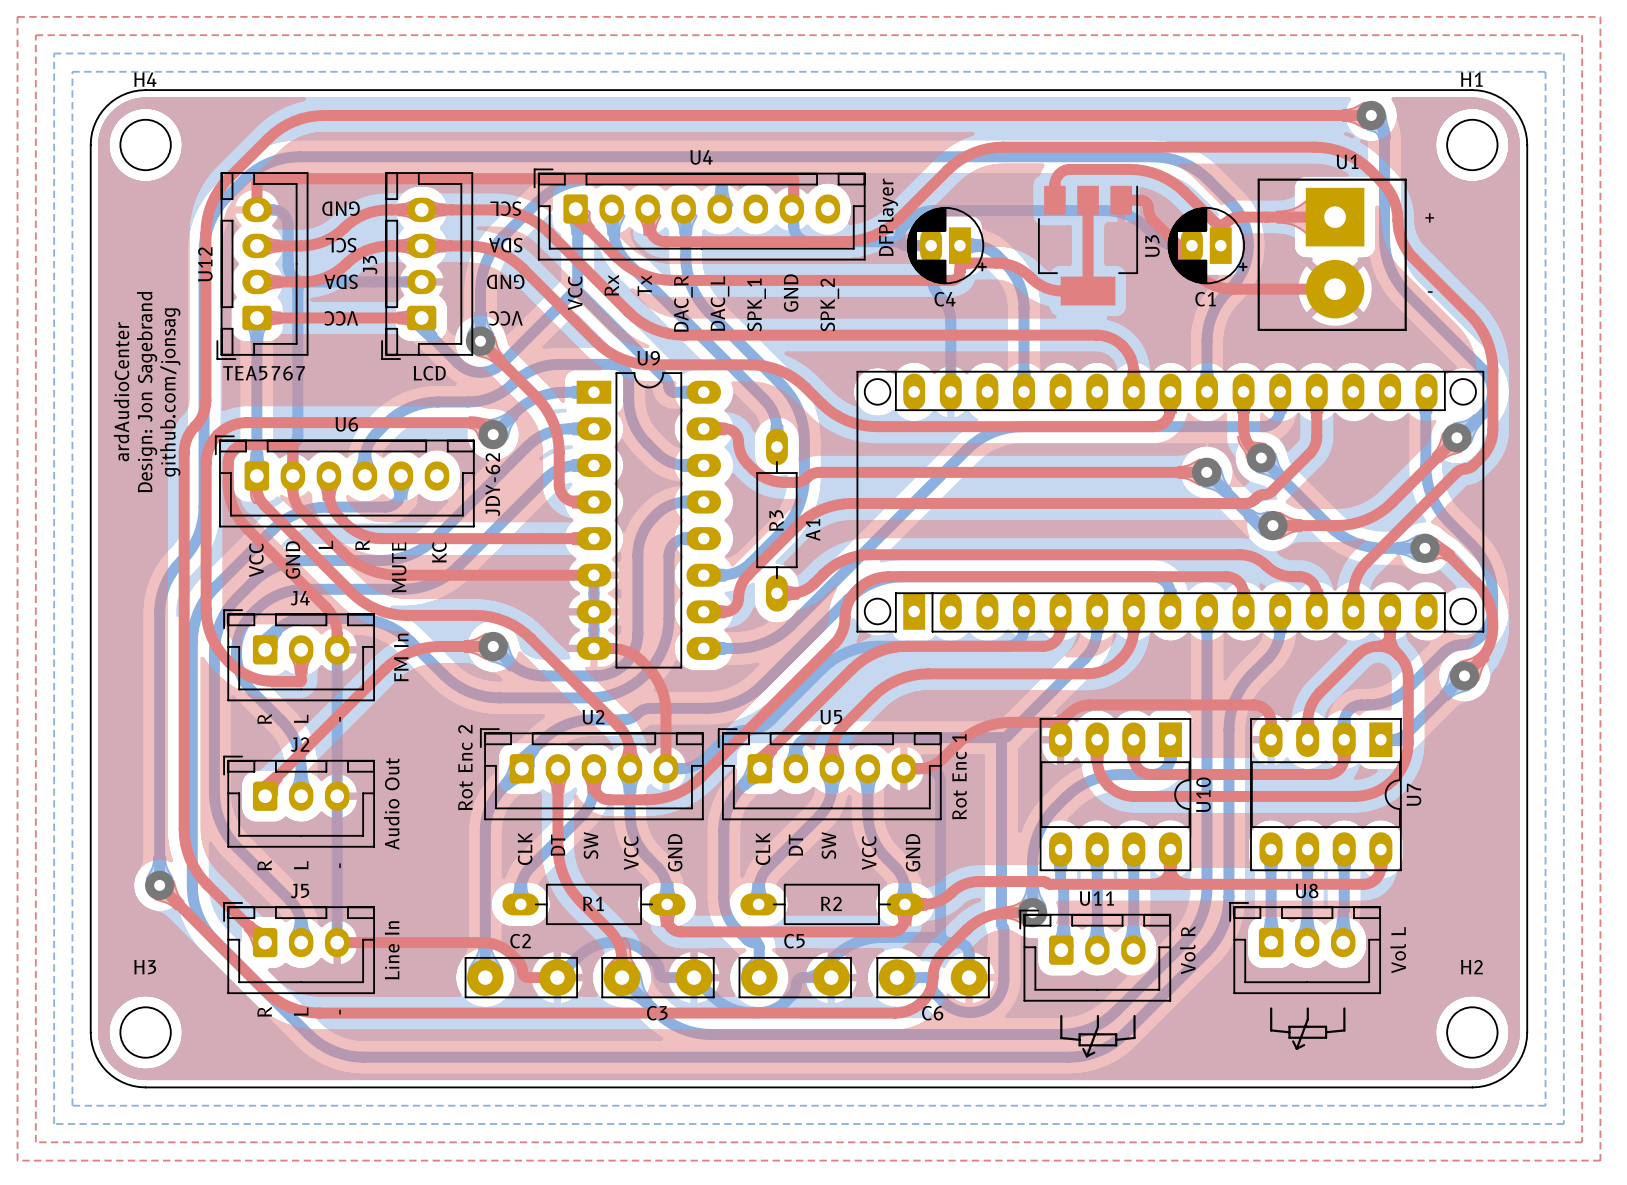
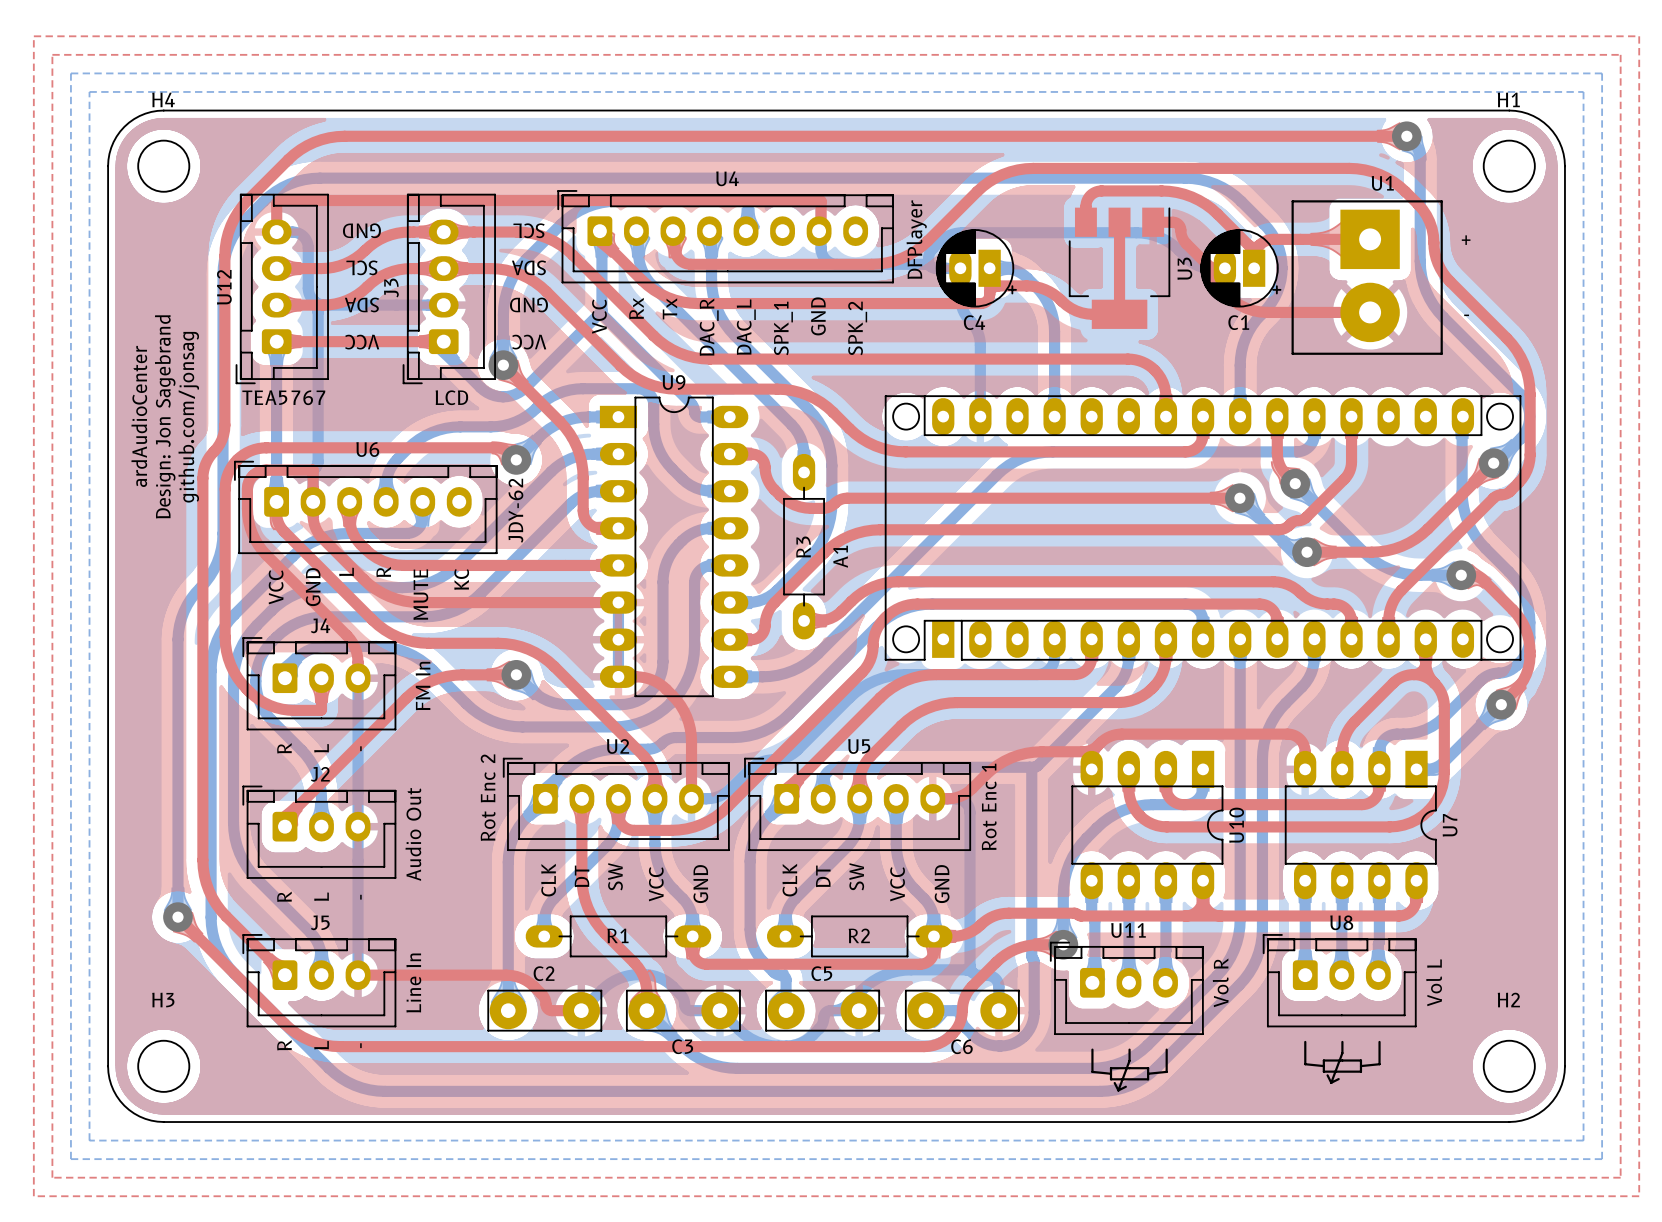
U9 footprint: [576, 372, 722, 669] -> [599, 396, 749, 698]
U10 footprint: [1039, 718, 1192, 872] -> [1071, 750, 1224, 900]
U7 footprint: [1250, 718, 1402, 872] -> [1284, 750, 1437, 900]

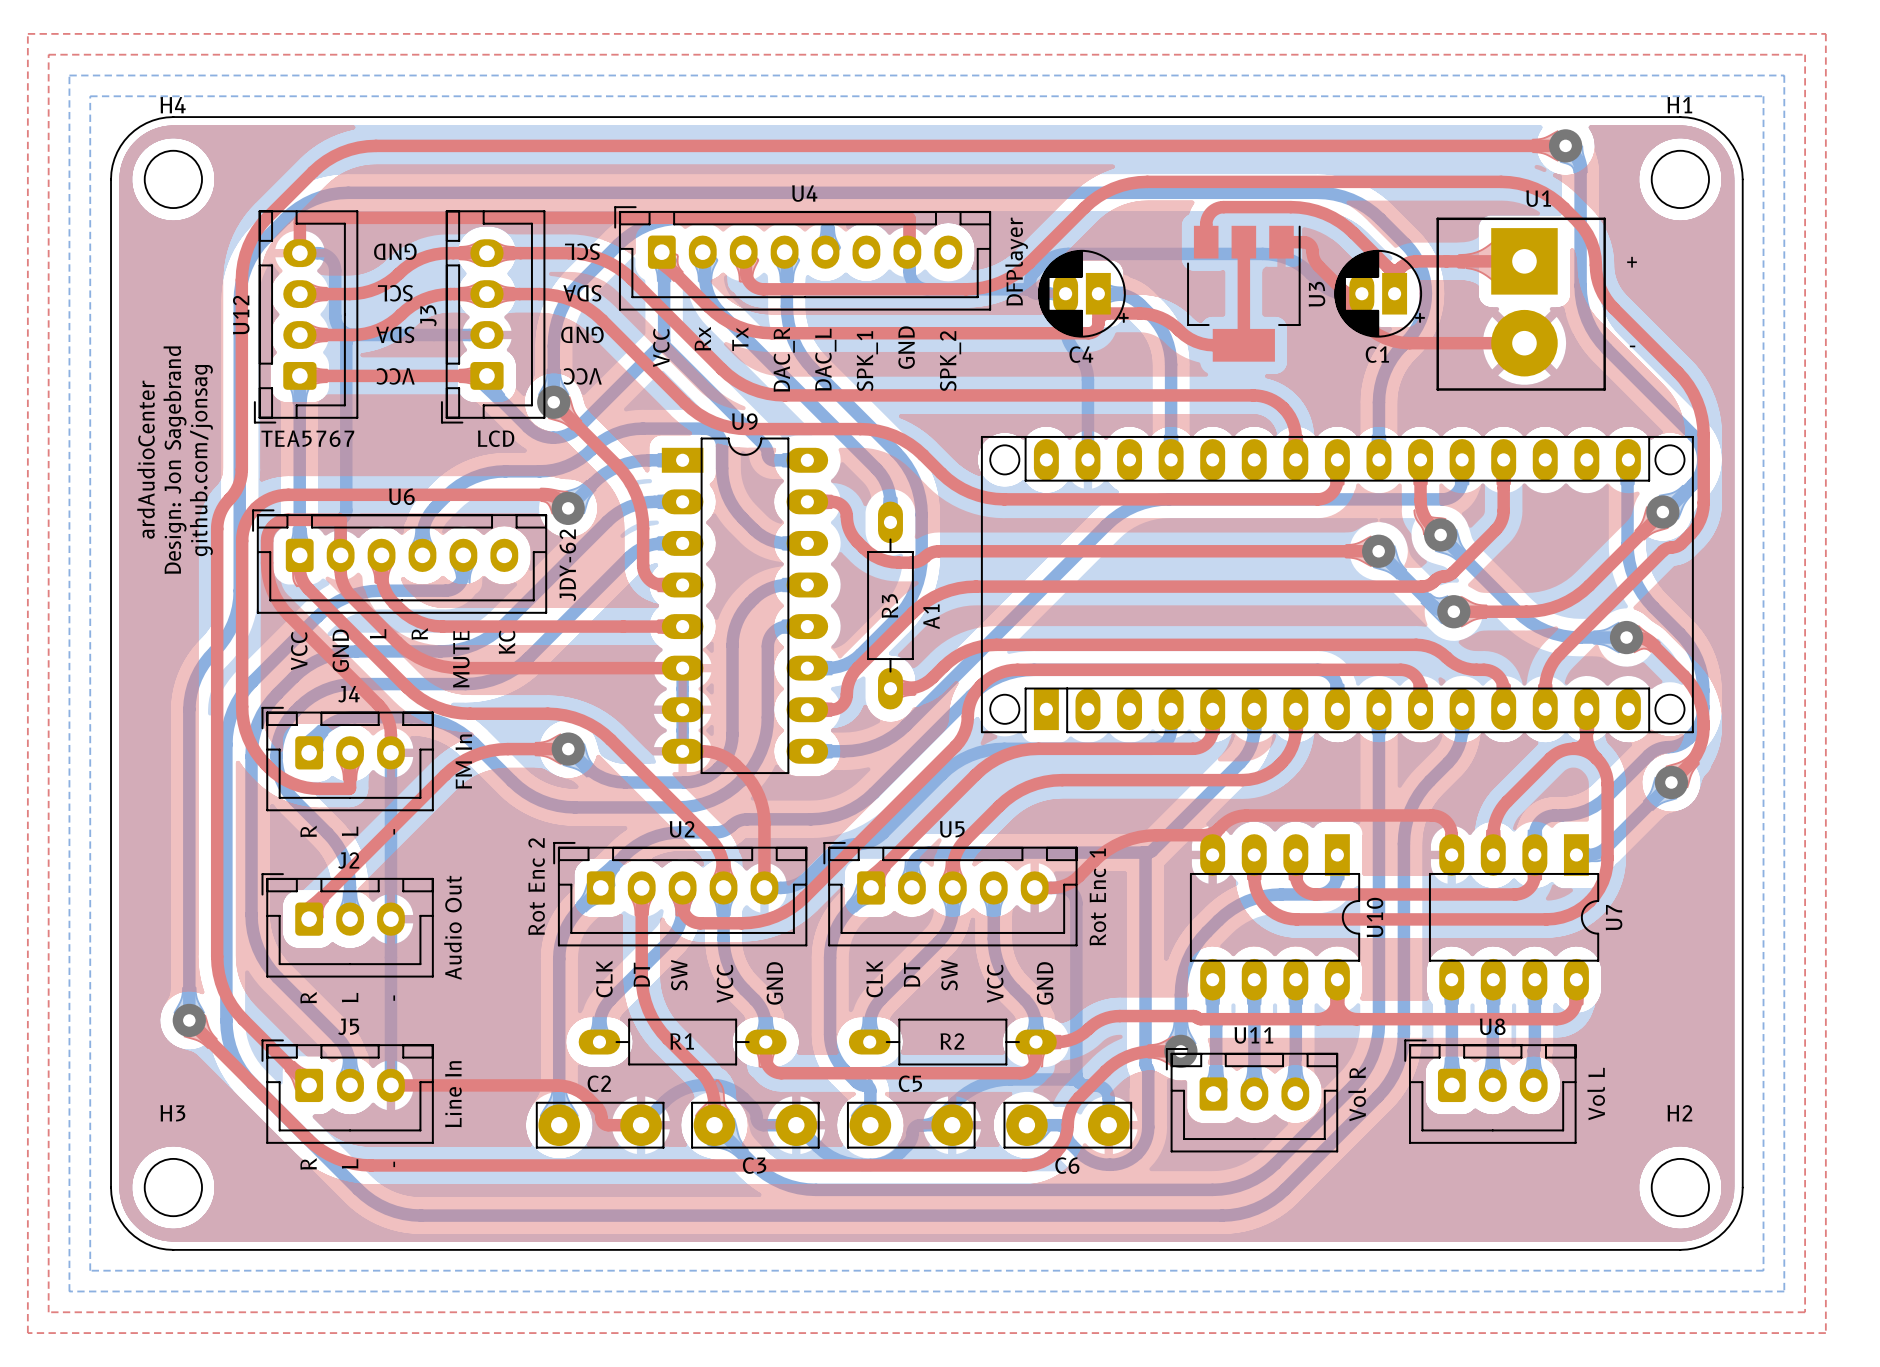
U8 footprint: [1262, 934, 1417, 1084] -> [1404, 1039, 1577, 1144]
U11 footprint: [1049, 941, 1204, 1092] -> [1165, 1048, 1339, 1153]

